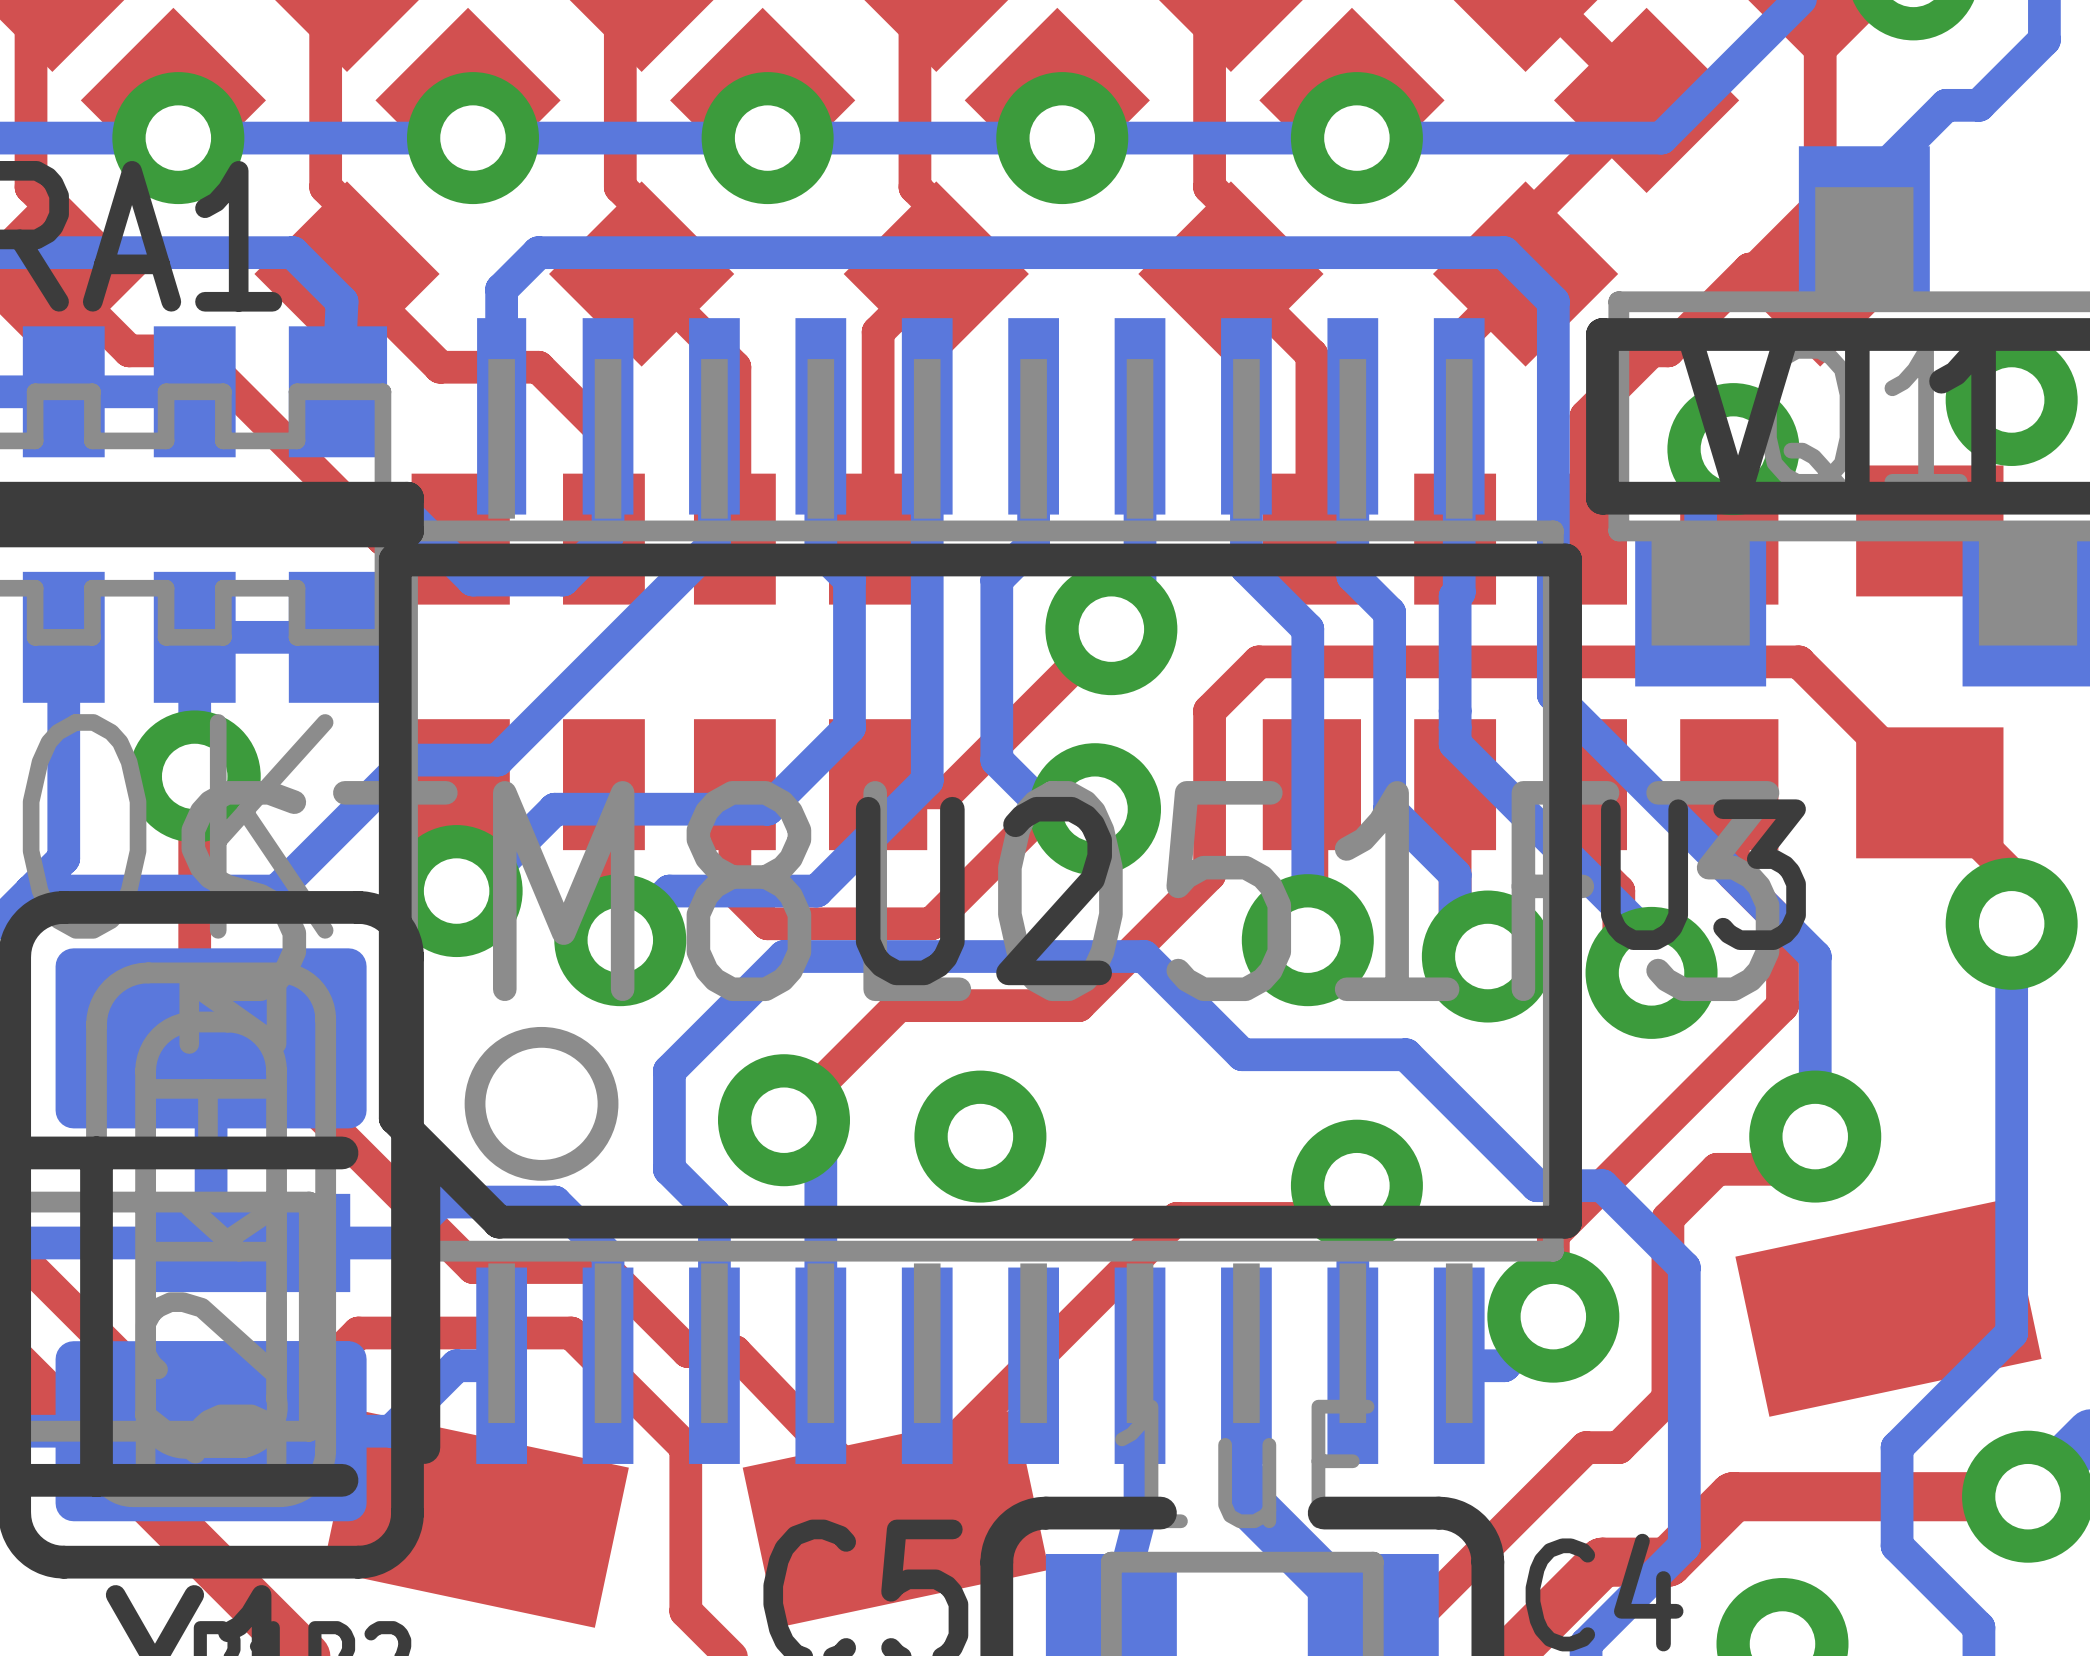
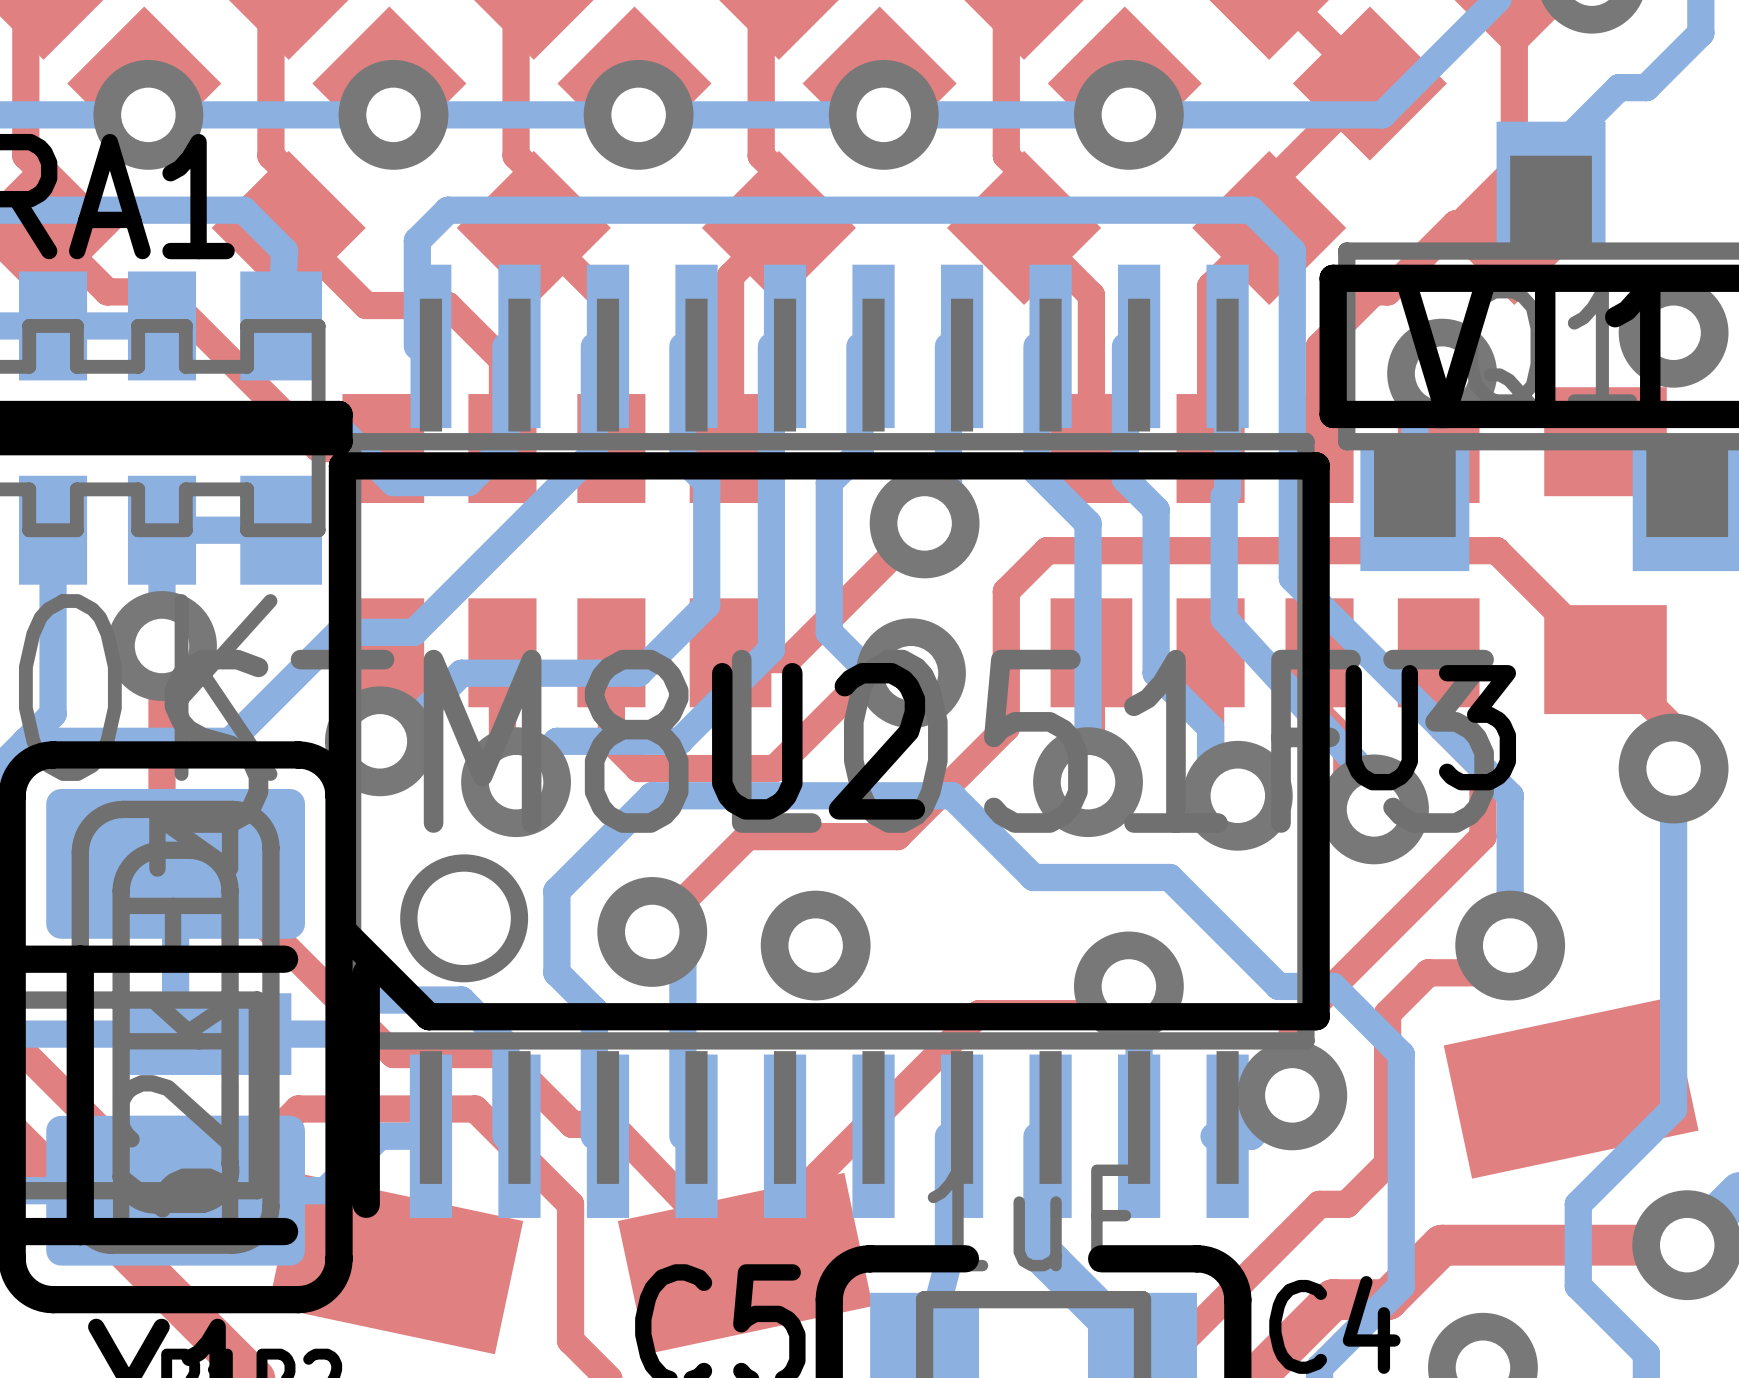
bottom track: (1459, 416) (1459, 592) (1455, 596) (1455, 743) (1651, 940) -> (1227, 346) (1227, 492) (1224, 496) (1224, 618) (1374, 782)
U3 position: (980, 891) -> (829, 741)

